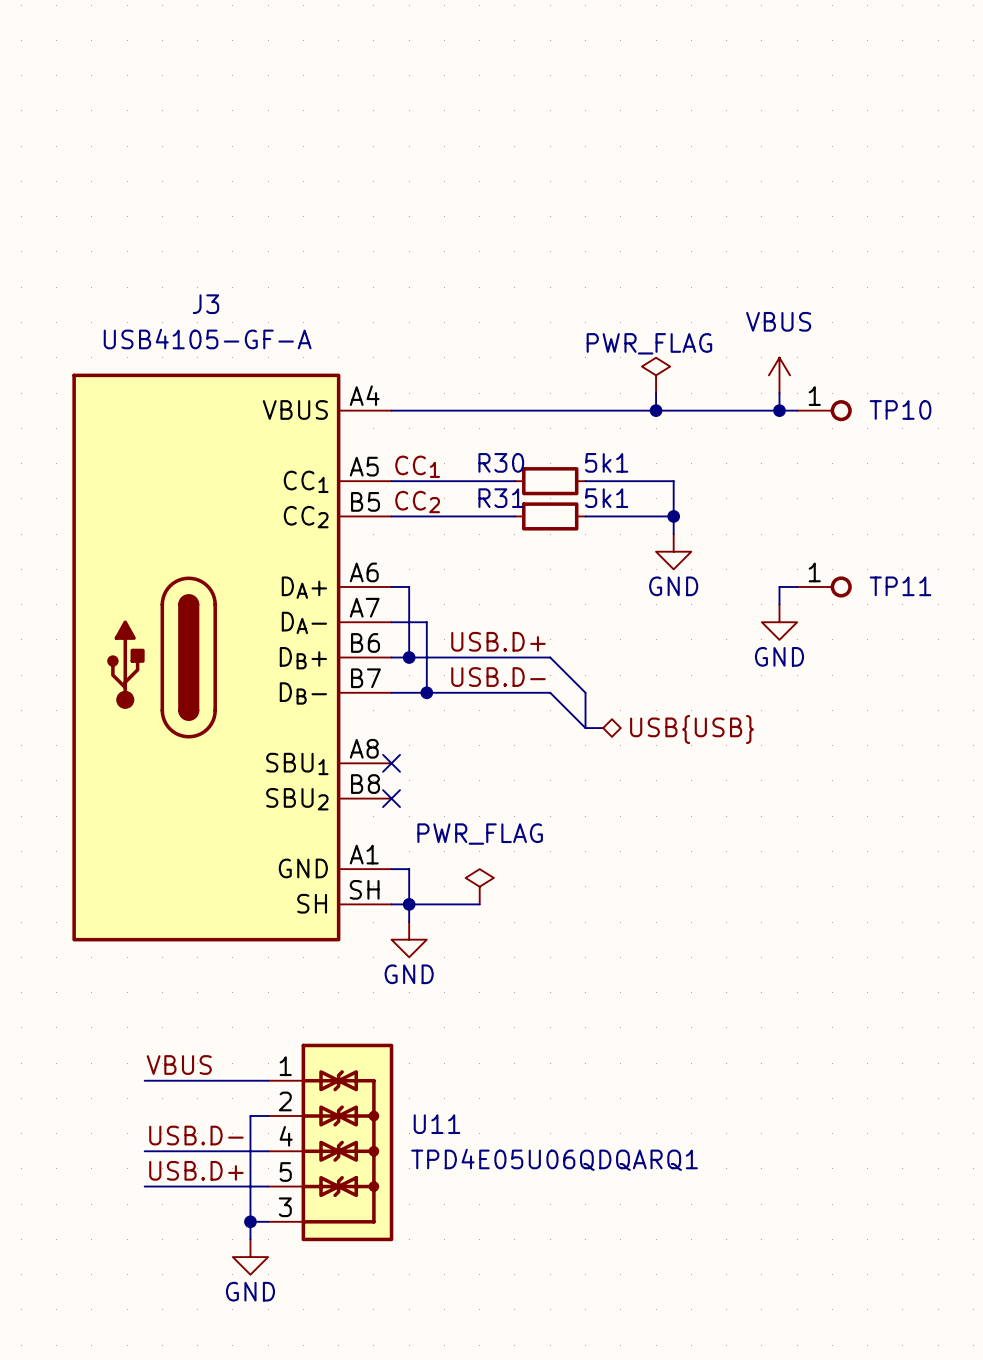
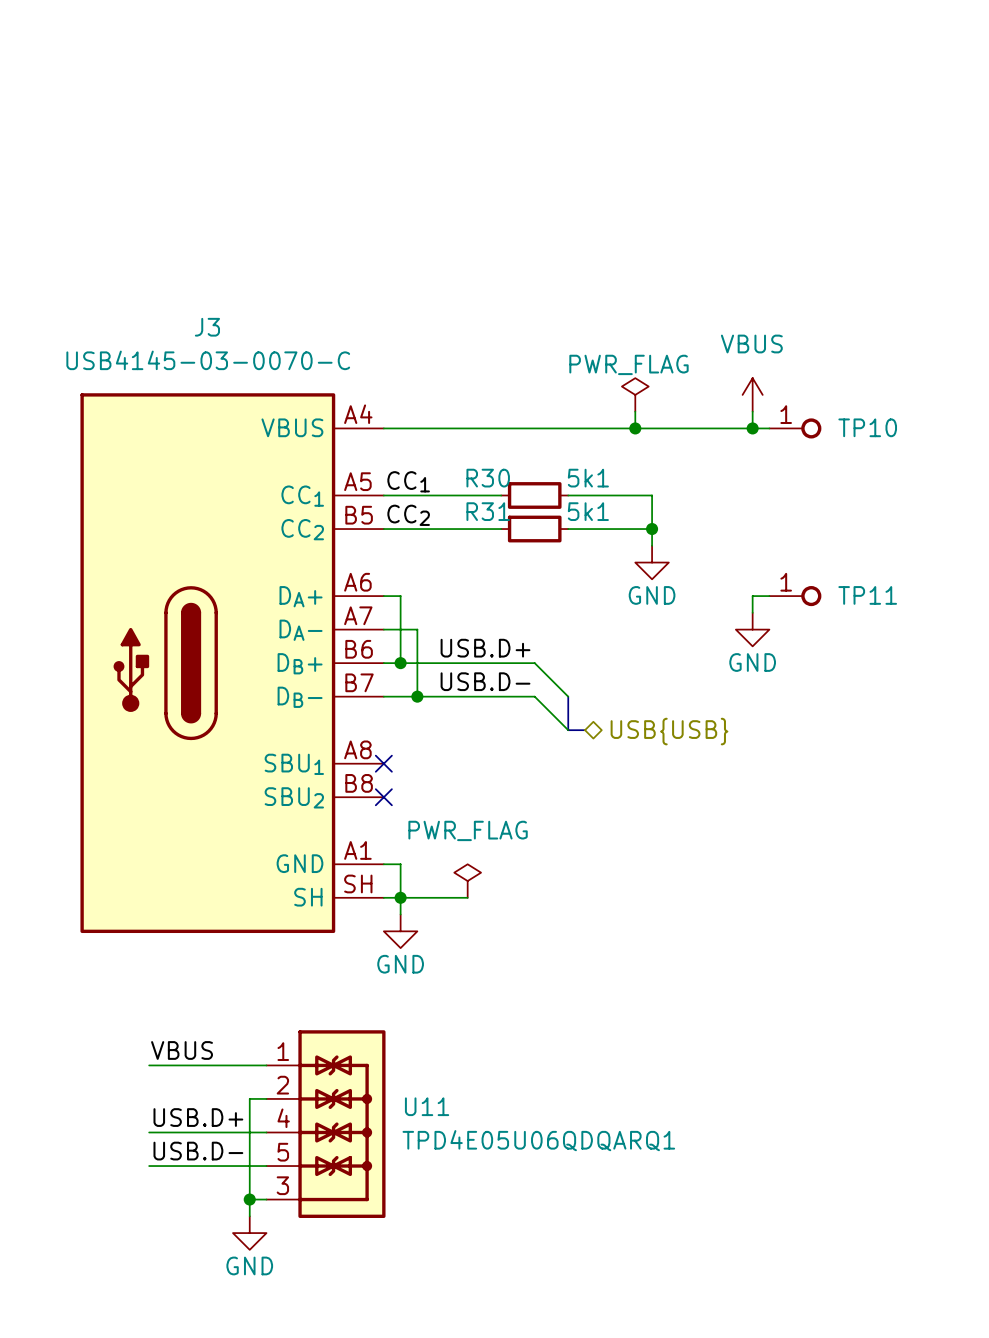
J3 text: USB4105-GF-A (207, 339) -> USB4145-03-0070-C (208, 360)
label: USB.D- (196, 1135) -> USB.D+ (198, 1117)
label: USB.D+ (196, 1170) -> USB.D- (198, 1151)

